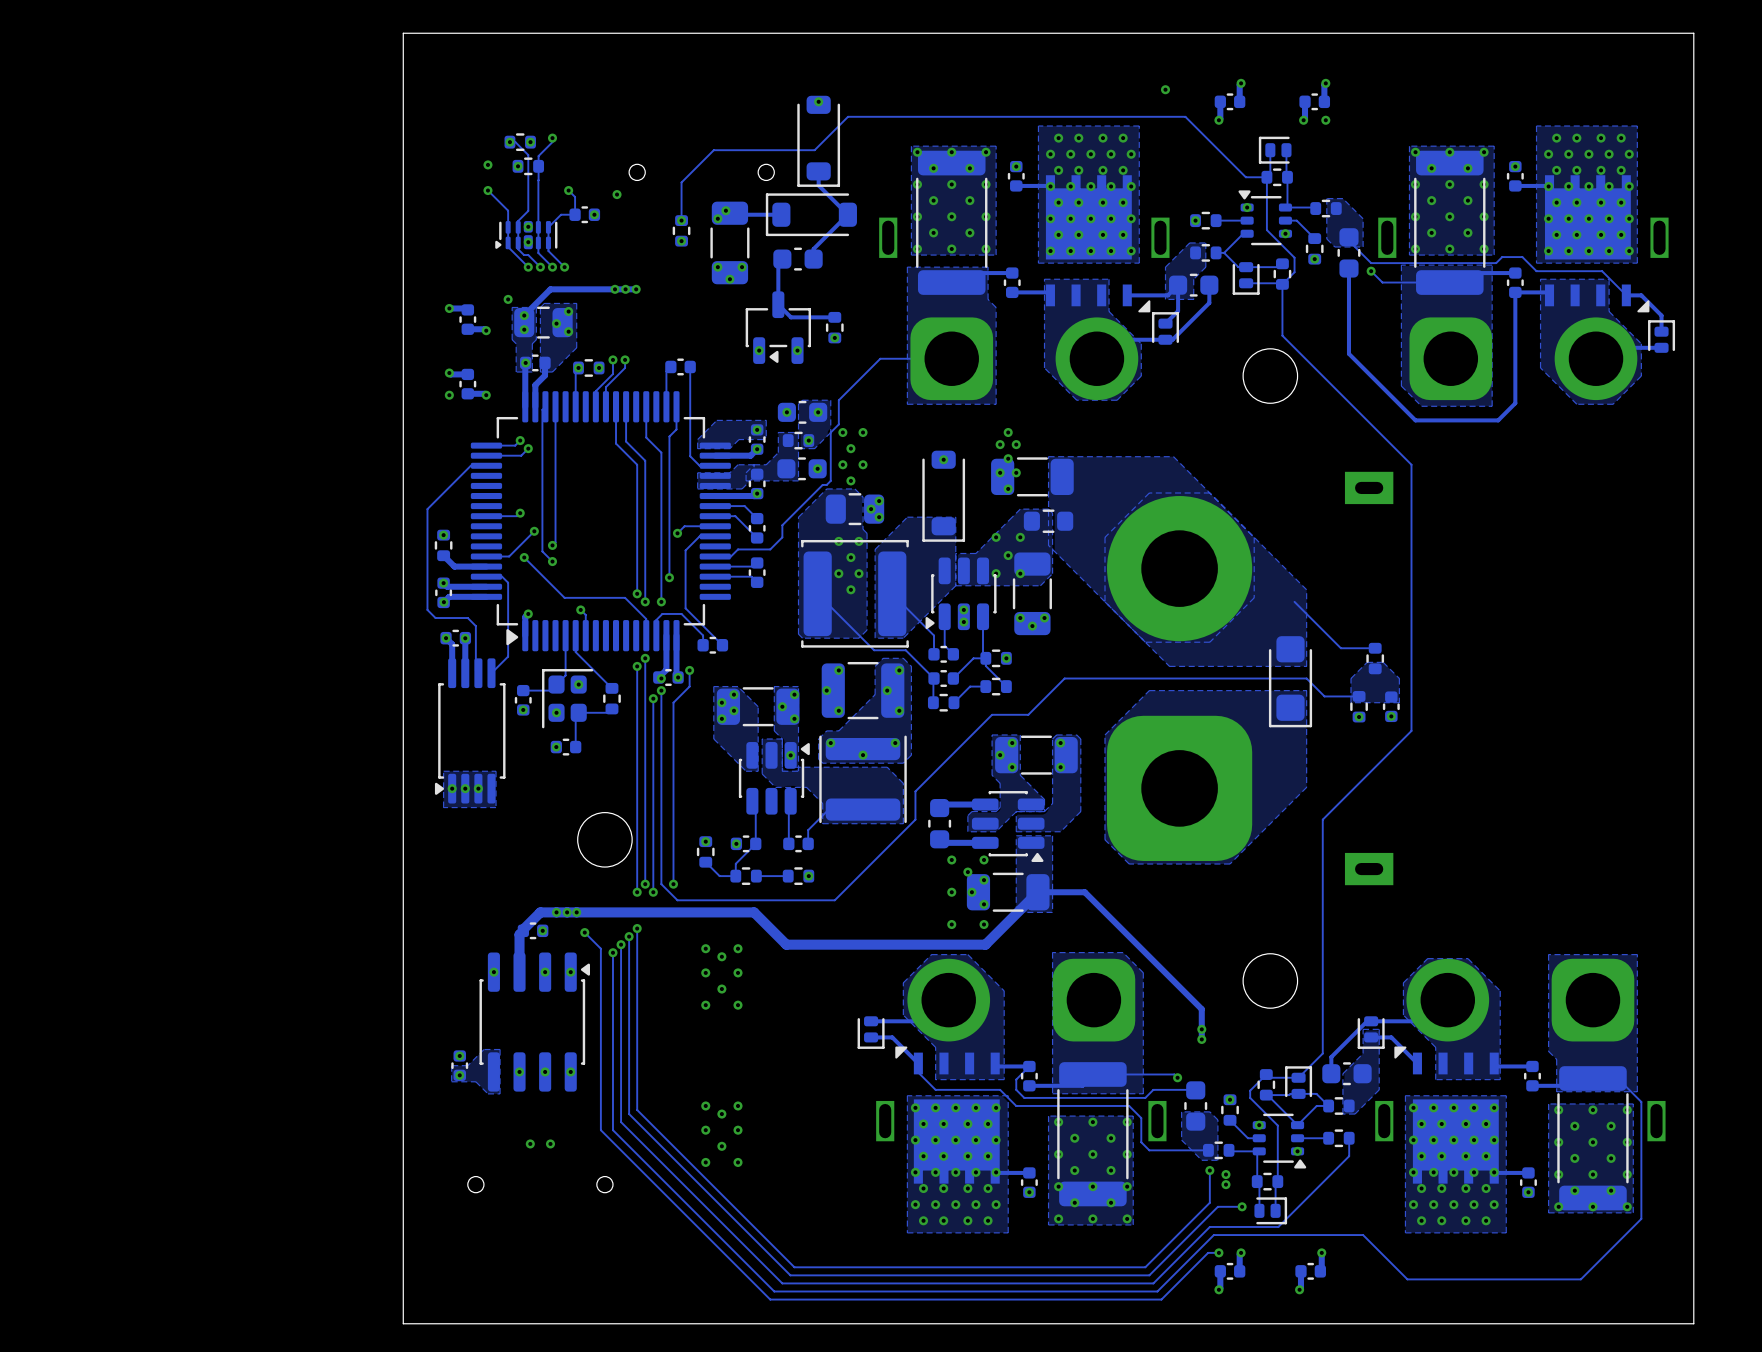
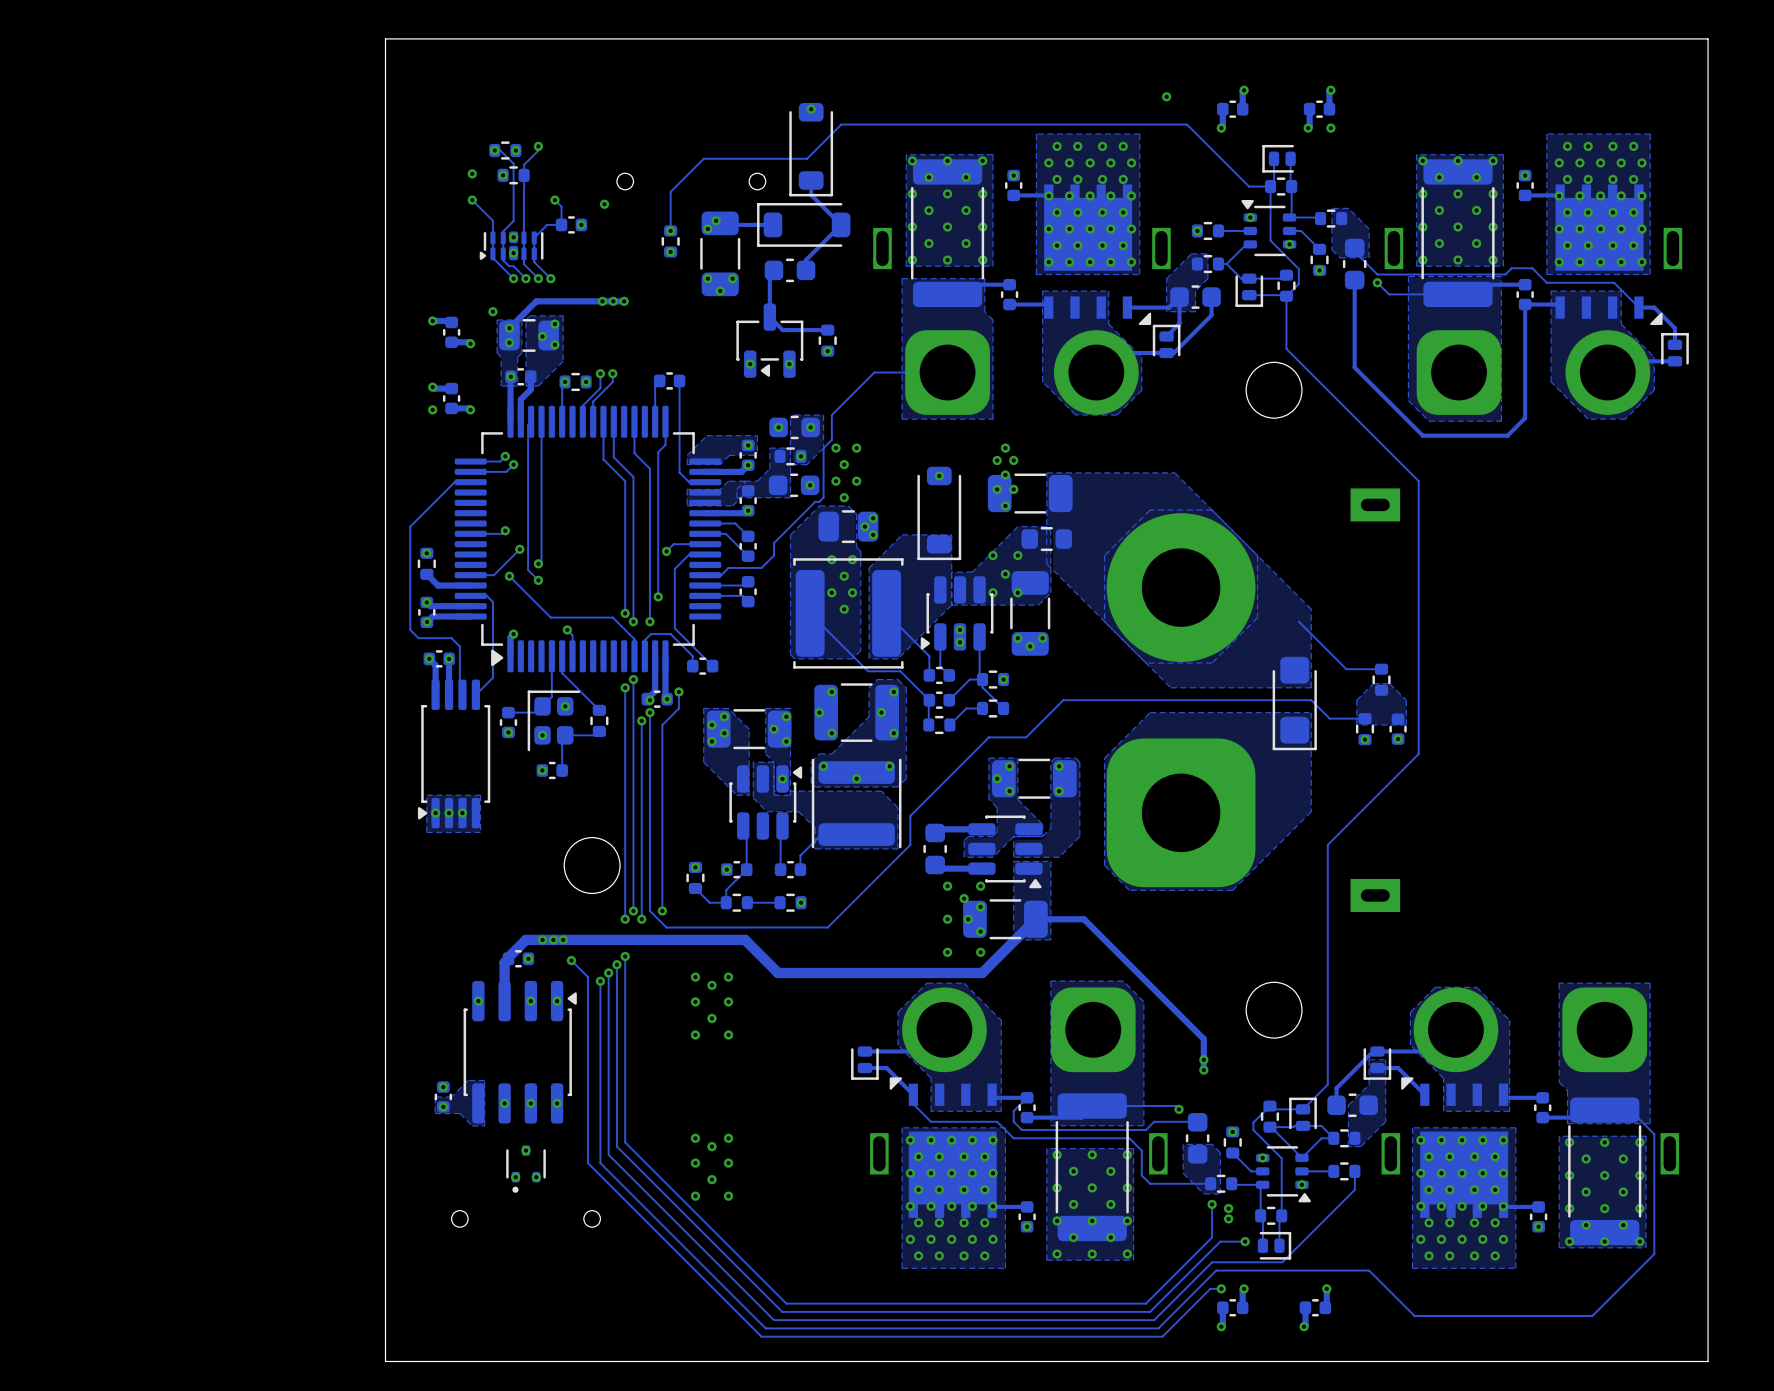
via: none -> (526, 1150)
part: none -> (526, 1169)

